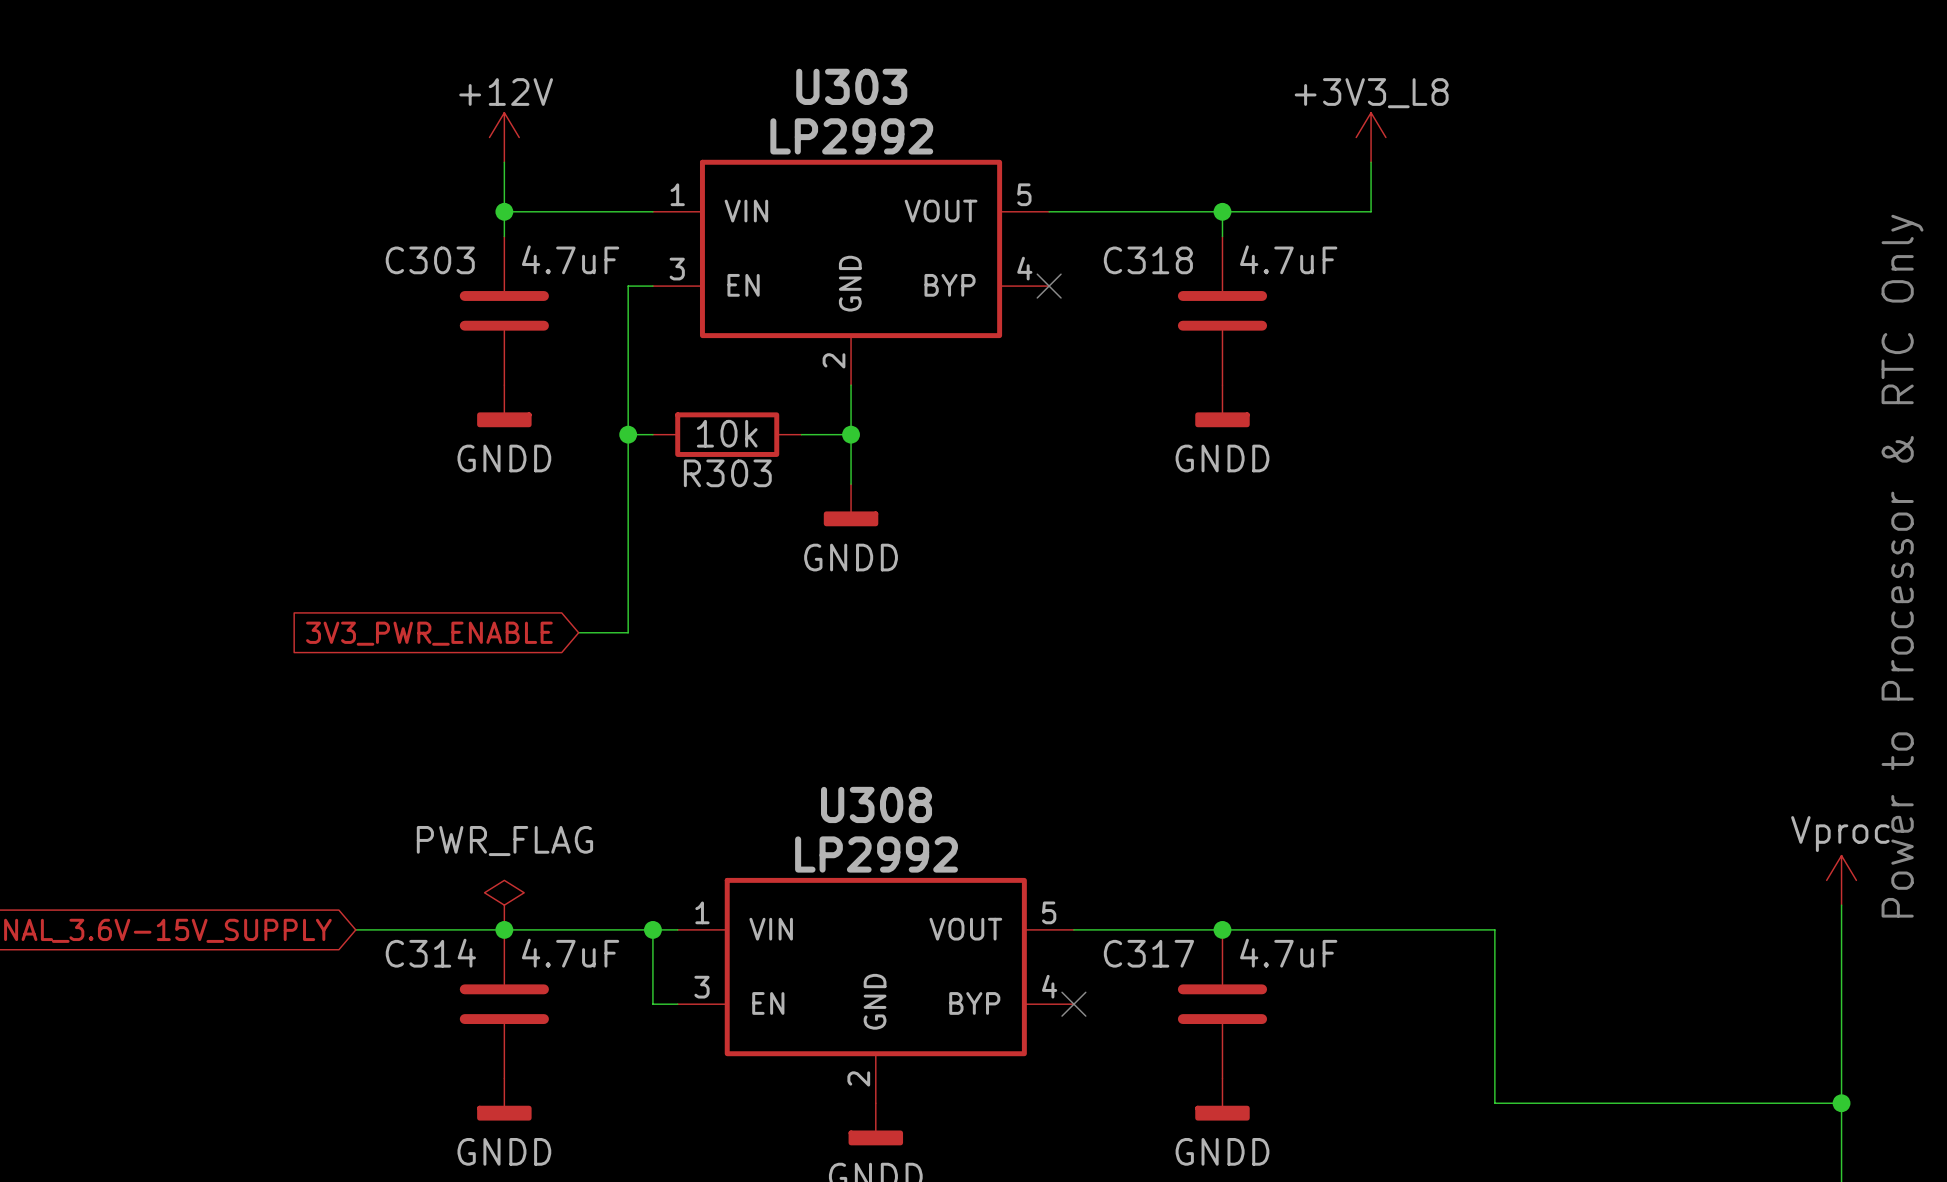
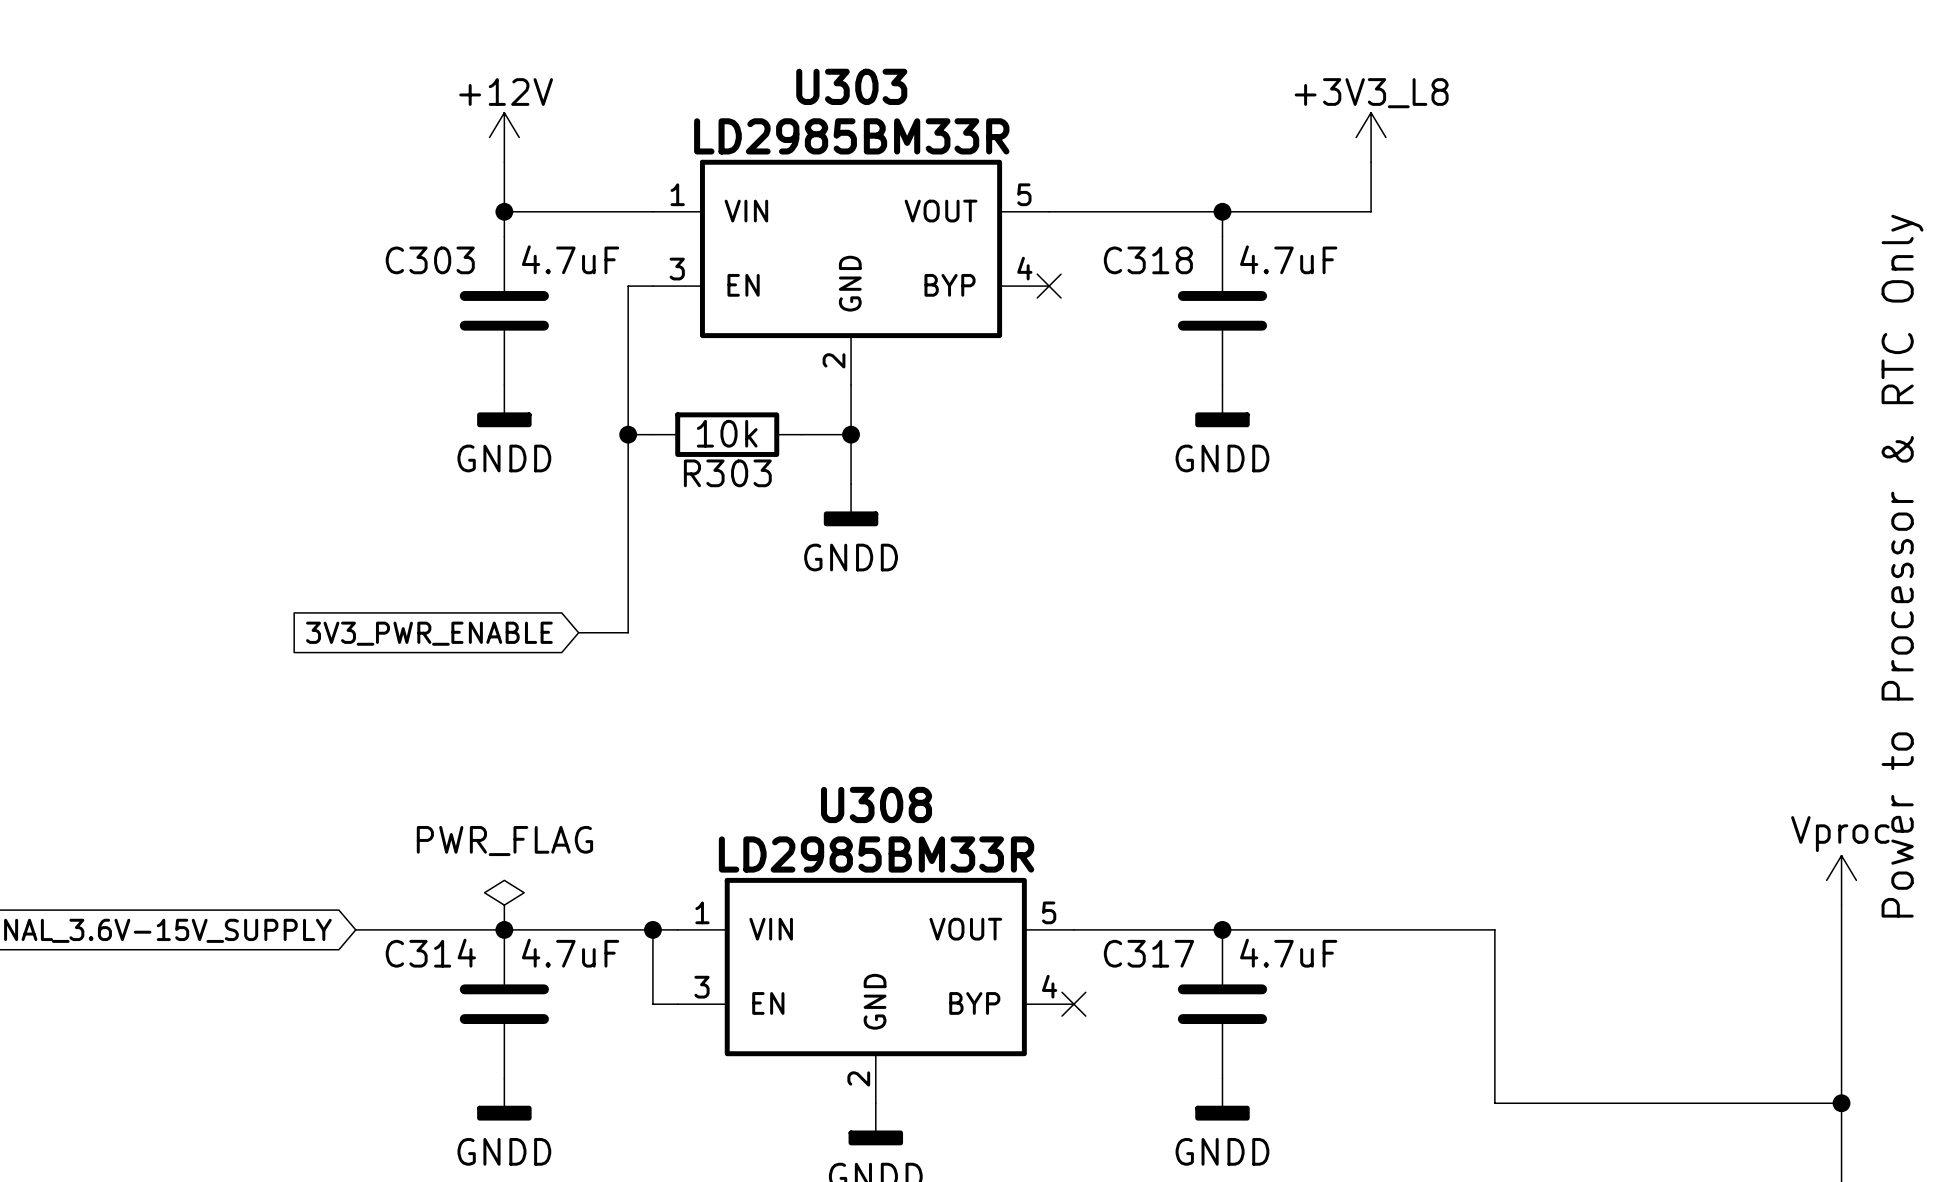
U303 value: LP2992 (851, 136) -> LD2985BM33R (851, 136)
U308 value: LP2992 (876, 854) -> LD2985BM33R (876, 854)

